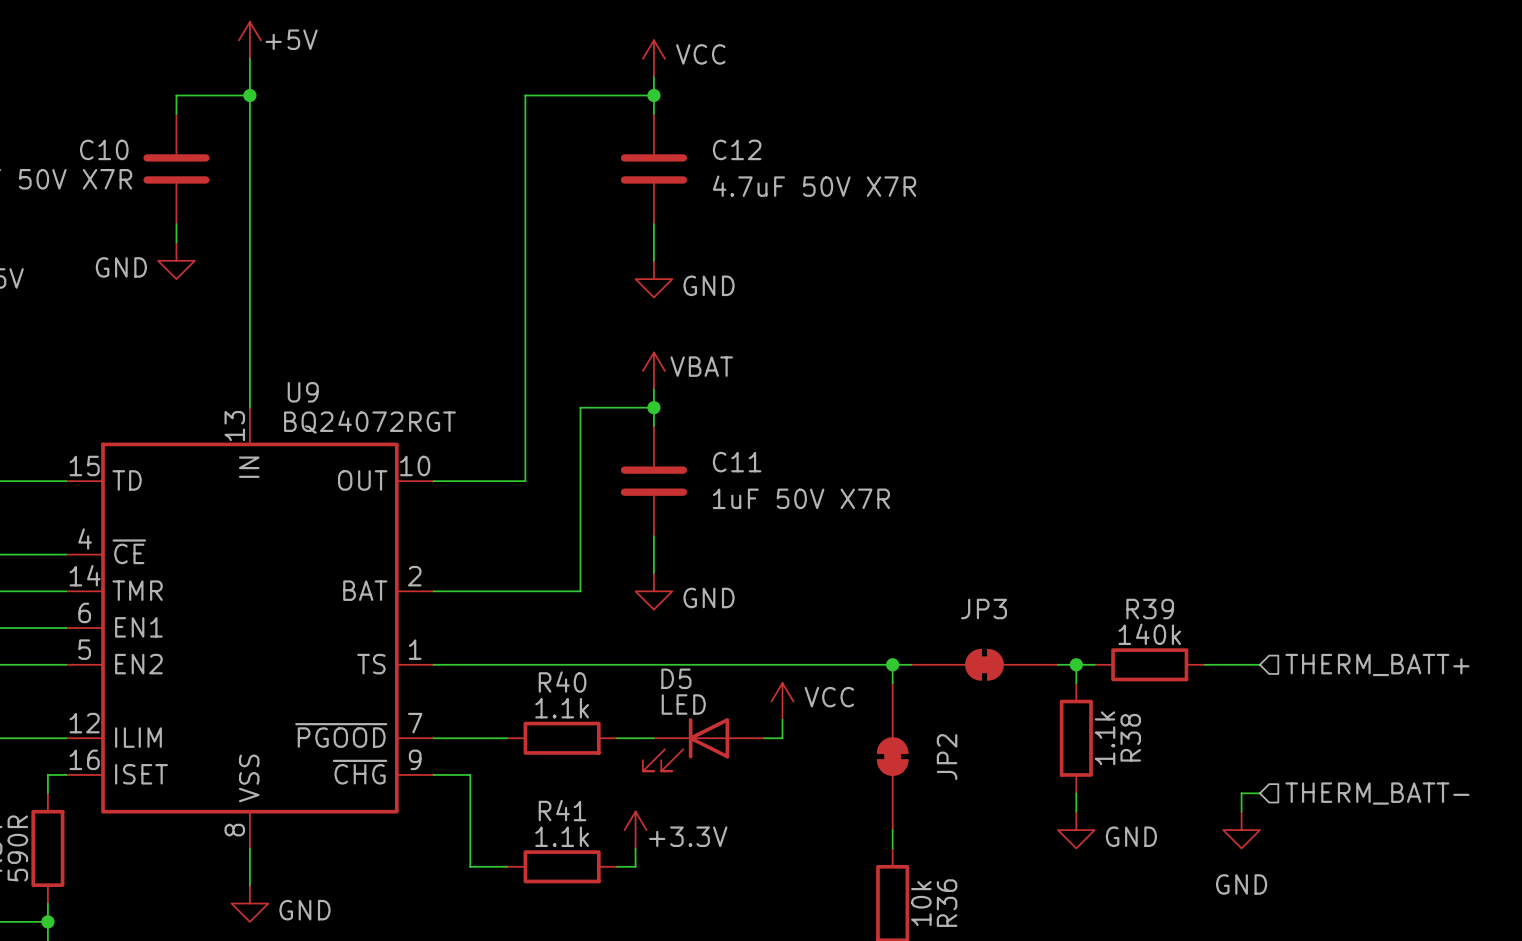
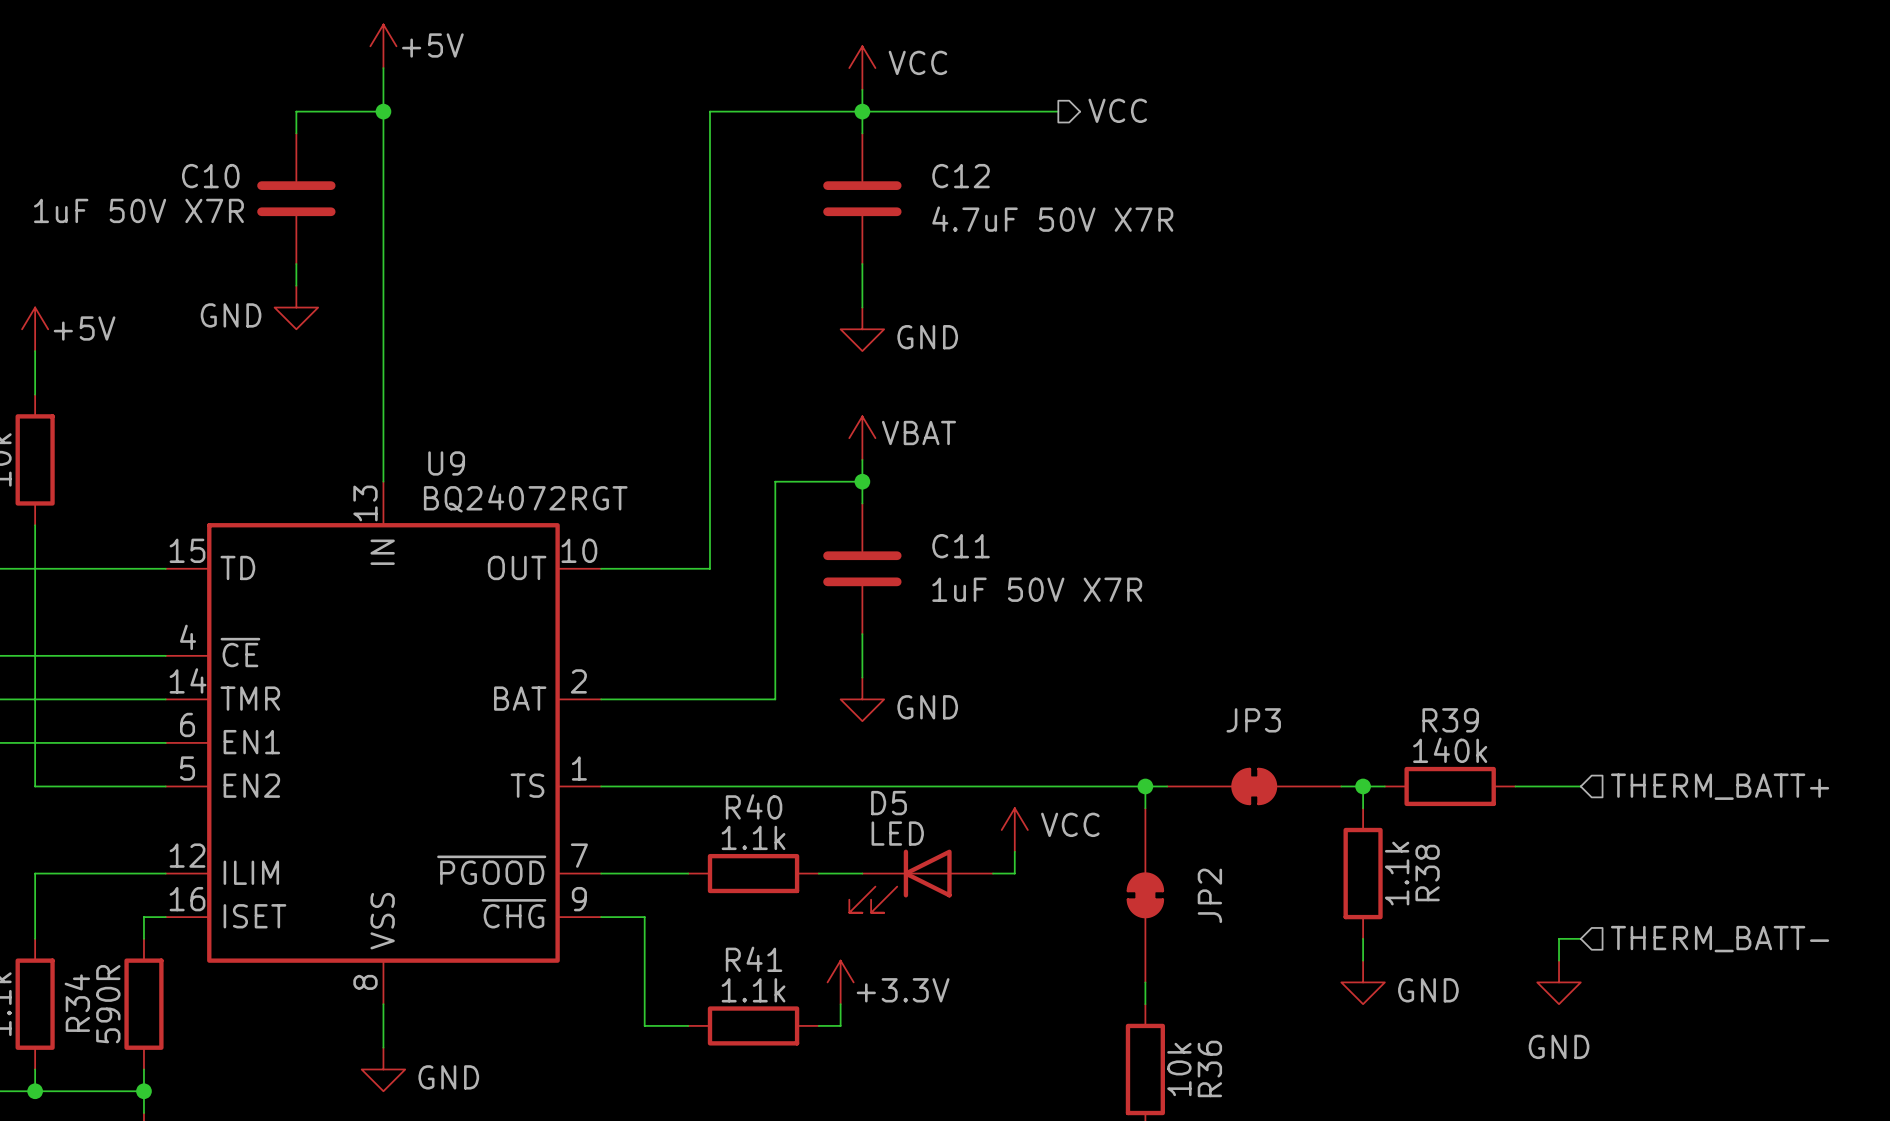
hierarchical label: none -> VCC (1117, 110)
wire: none -> (862, 111) (1058, 111)

